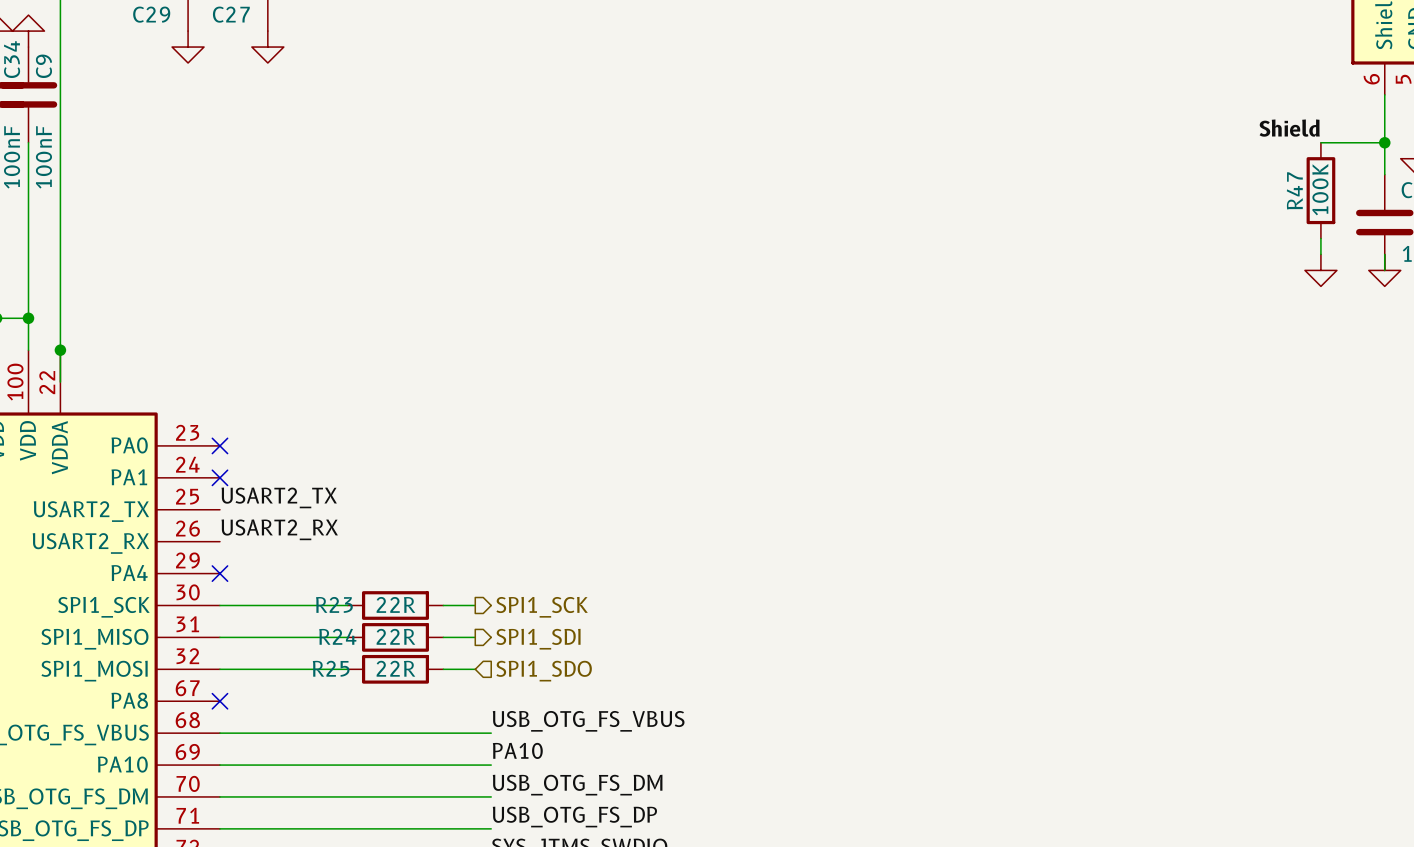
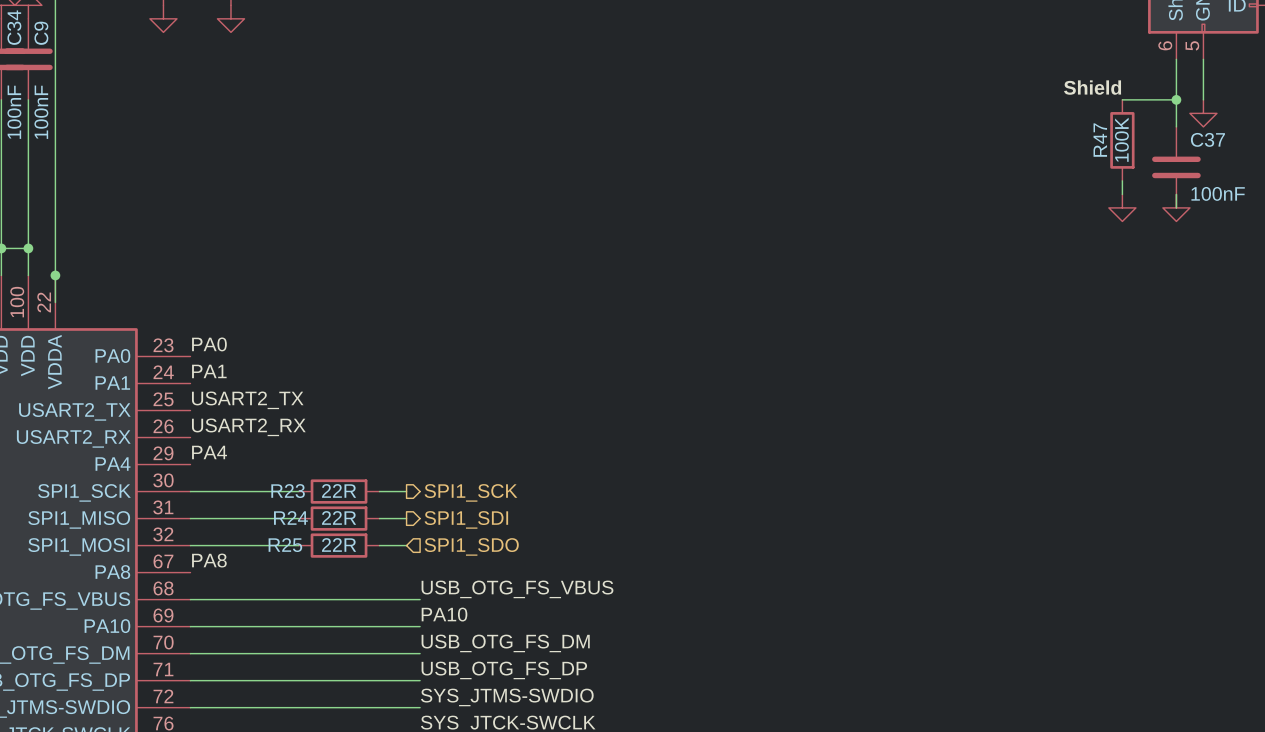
label: none -> PA0 (209, 344)
no-connect mark: (219, 445) -> none
label: none -> PA1 (209, 371)
no-connect mark: (219, 477) -> none
label: none -> PA4 (209, 452)
no-connect mark: (219, 573) -> none
label: none -> PA8 (209, 560)
no-connect mark: (219, 701) -> none

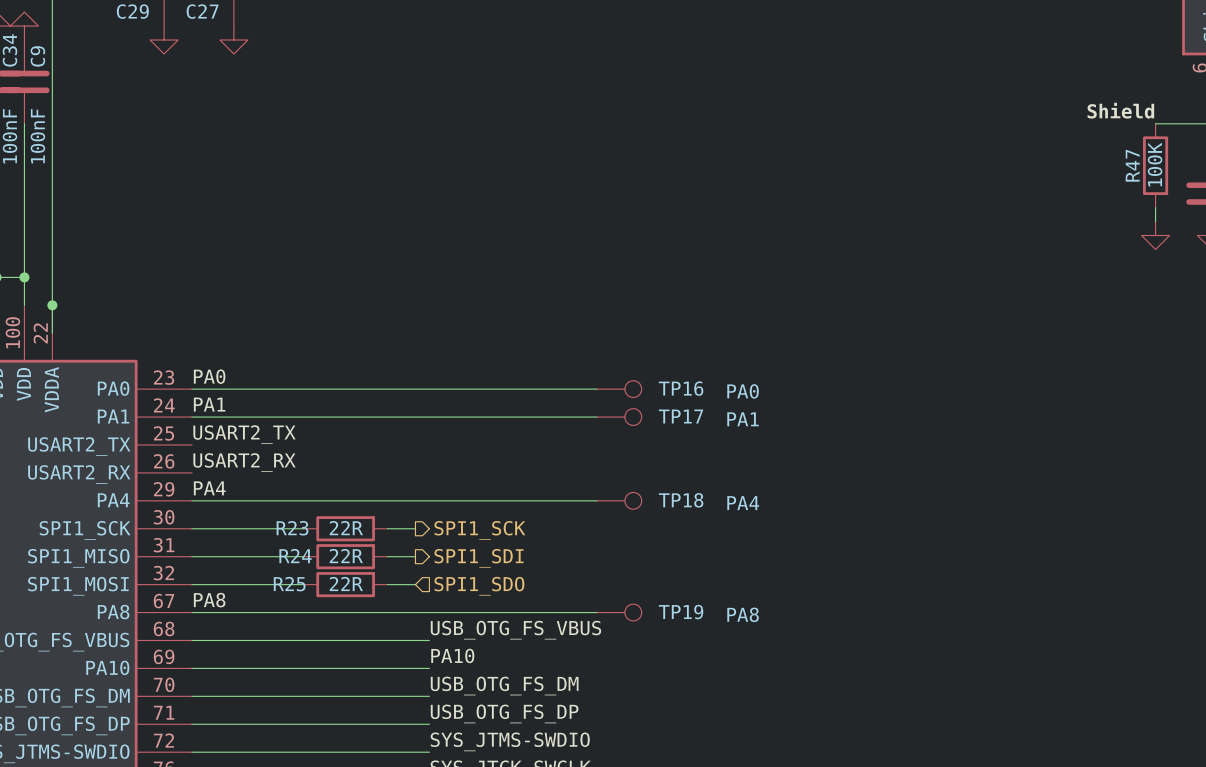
wire: none -> (192, 389) (596, 389)
TP16: none -> PA0 (619, 389)
wire: none -> (192, 417) (596, 417)
TP17: none -> PA1 (619, 417)
wire: none -> (192, 500) (596, 500)
TP18: none -> PA4 (619, 500)
wire: none -> (192, 612) (596, 612)
TP19: none -> PA8 (619, 612)

